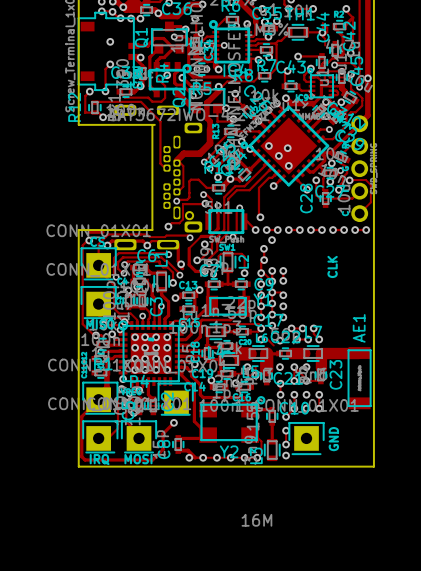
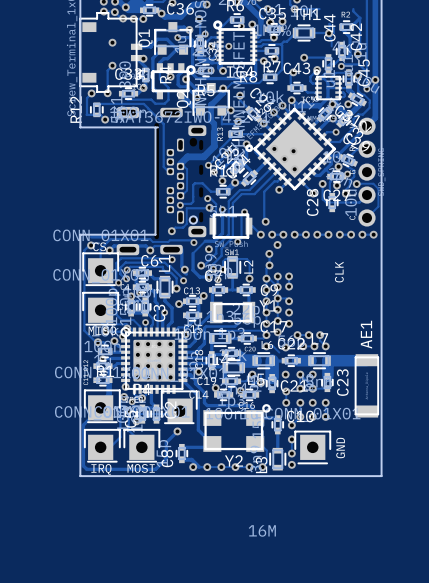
via: (313, 8) -> none
via: (346, 8) -> none
via: (250, 148) -> none

